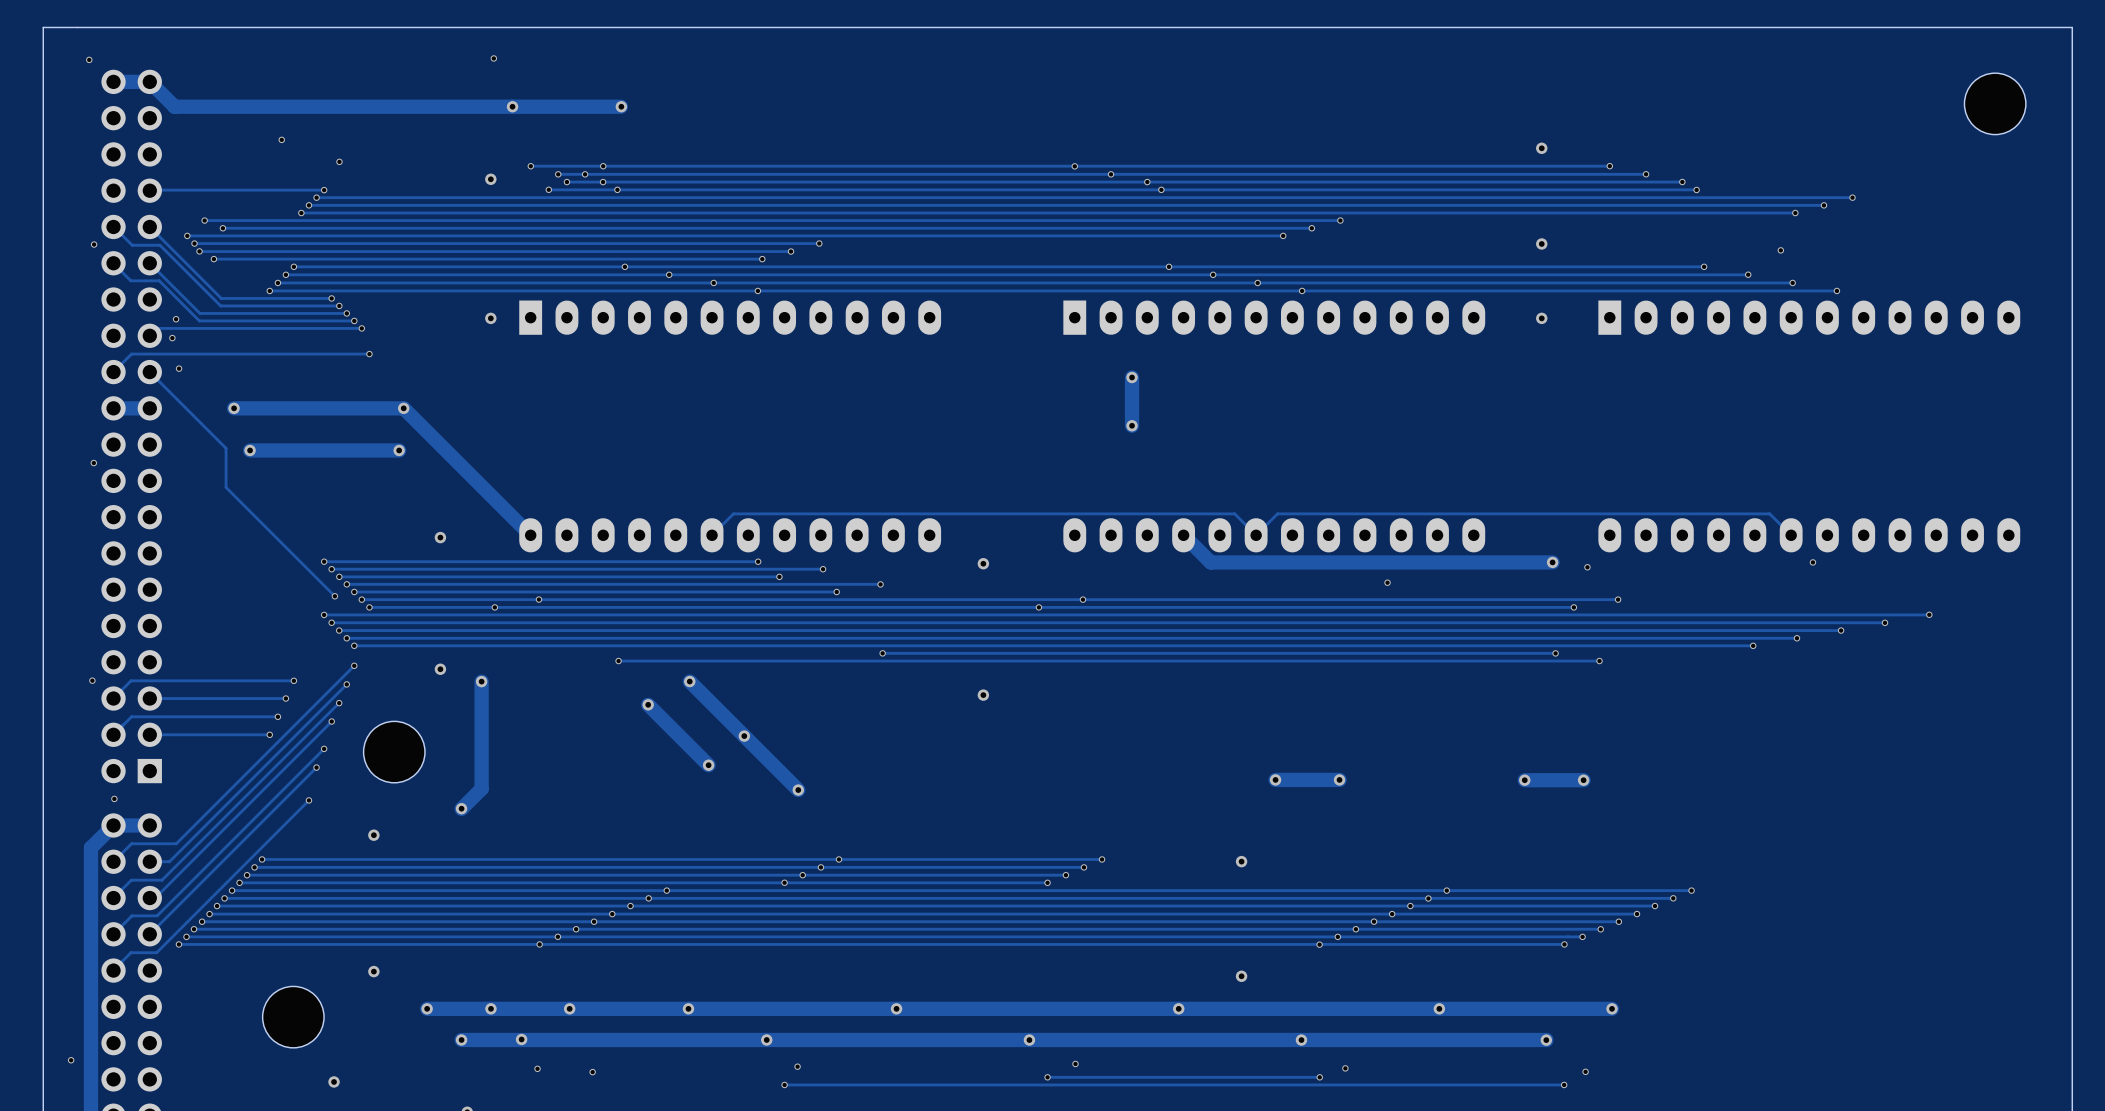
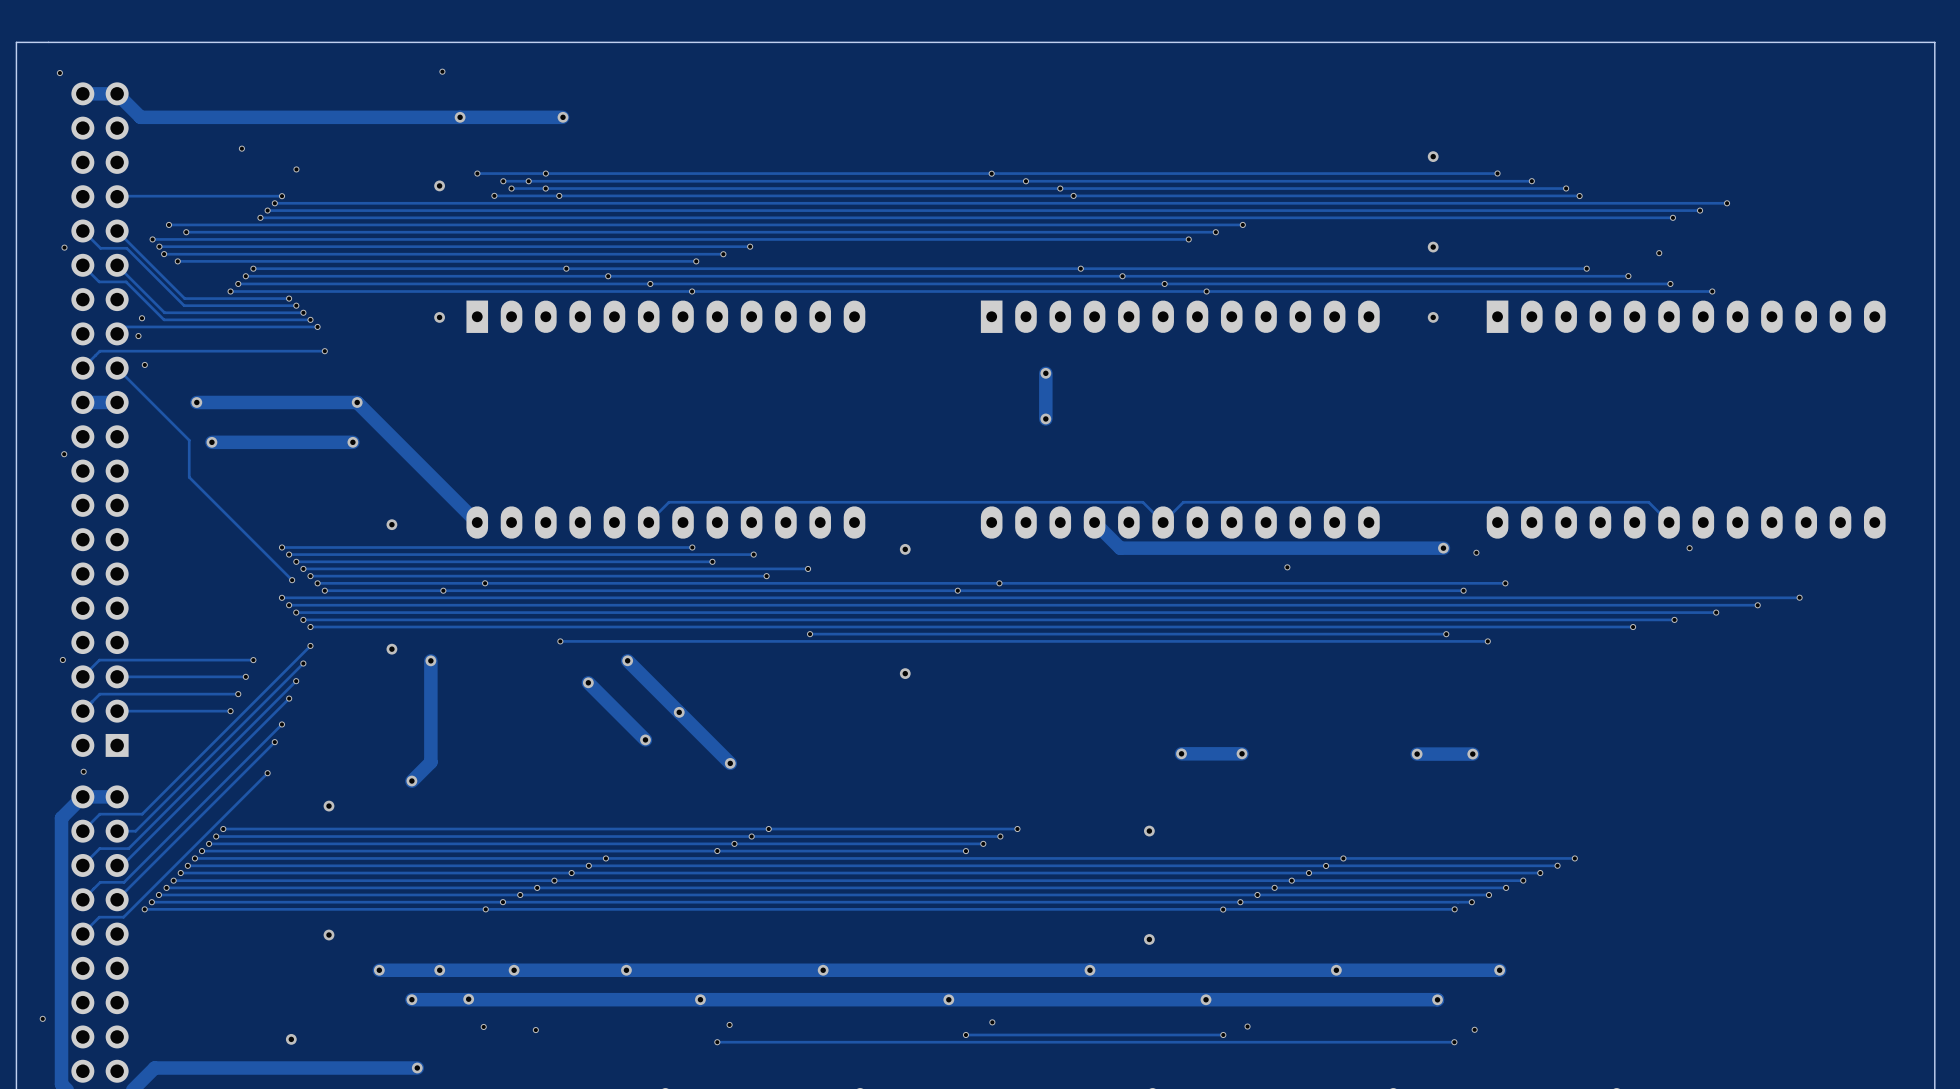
part: (1995, 103) -> none
part: (394, 752) -> none
part: (293, 1017) -> none

